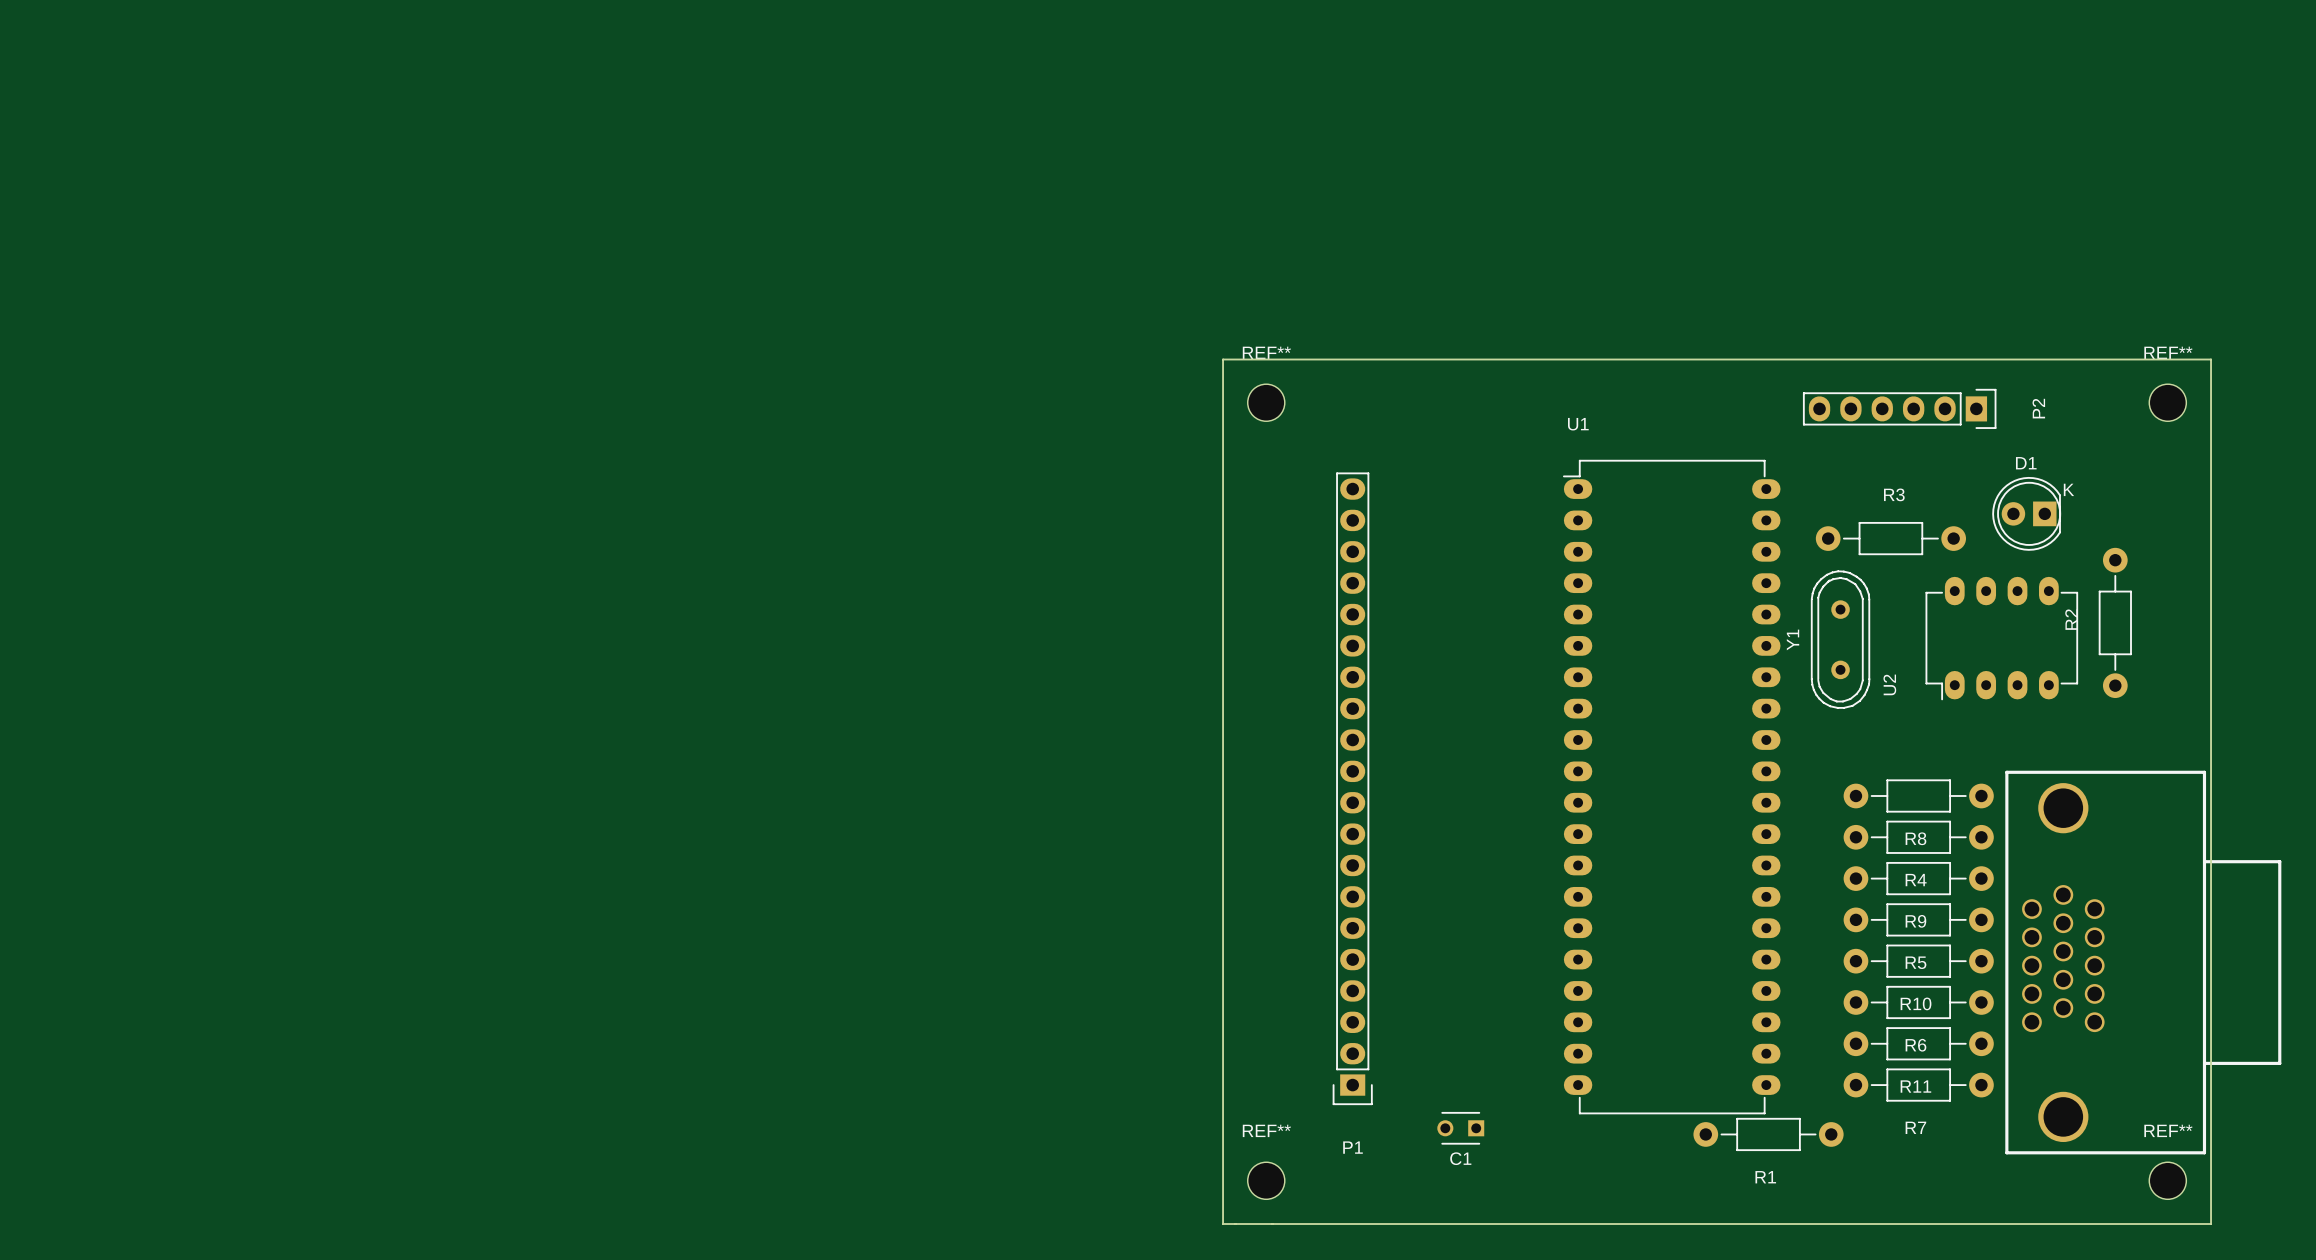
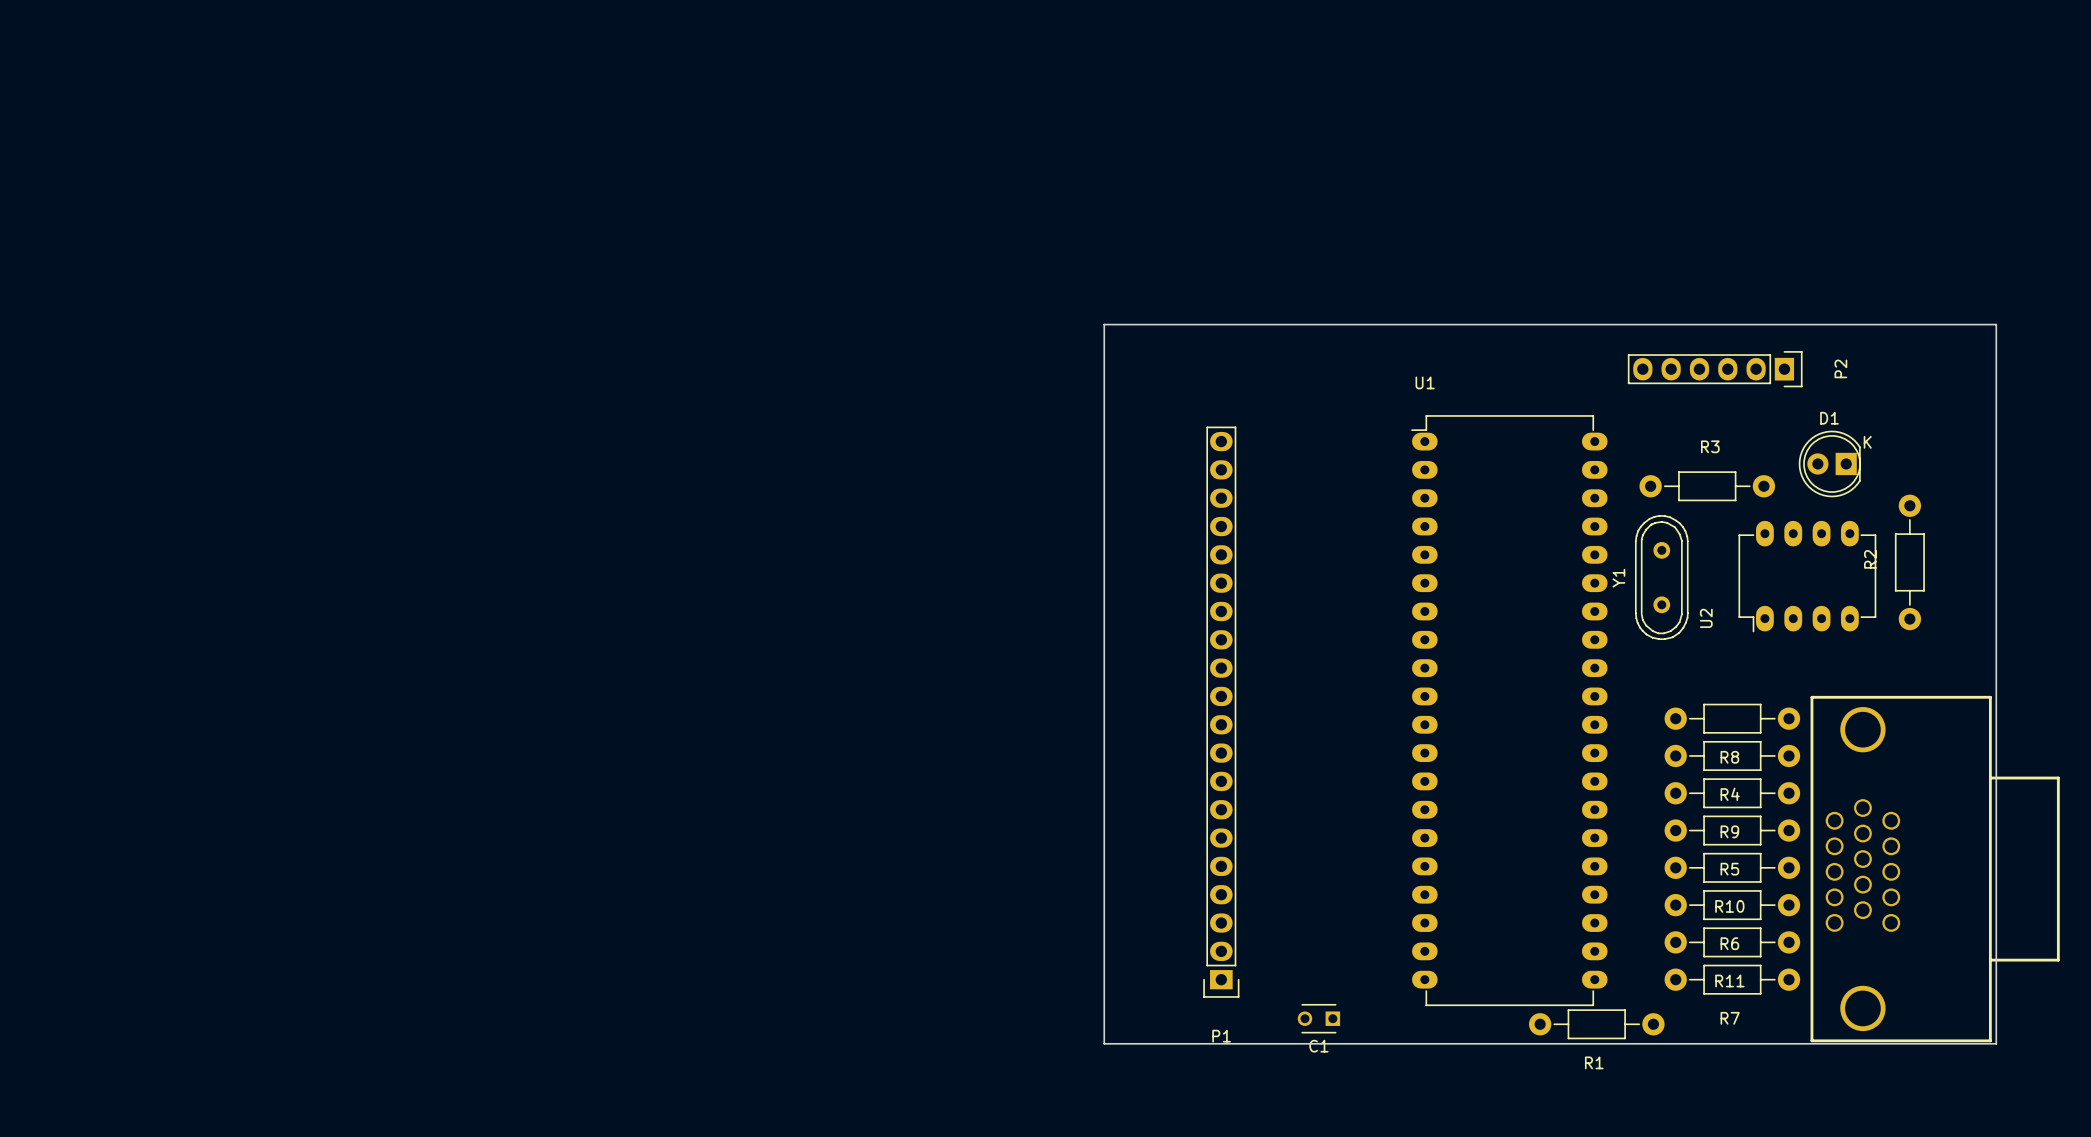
REF**: (1266, 402) -> none
REF**: (2167, 402) -> none
board edge: (1223, 1156) (1223, 1224) (2211, 1224) (2211, 1156) -> (1104, 1043) (1996, 1043)
REF**: (1266, 1180) -> none
REF**: (2167, 1180) -> none

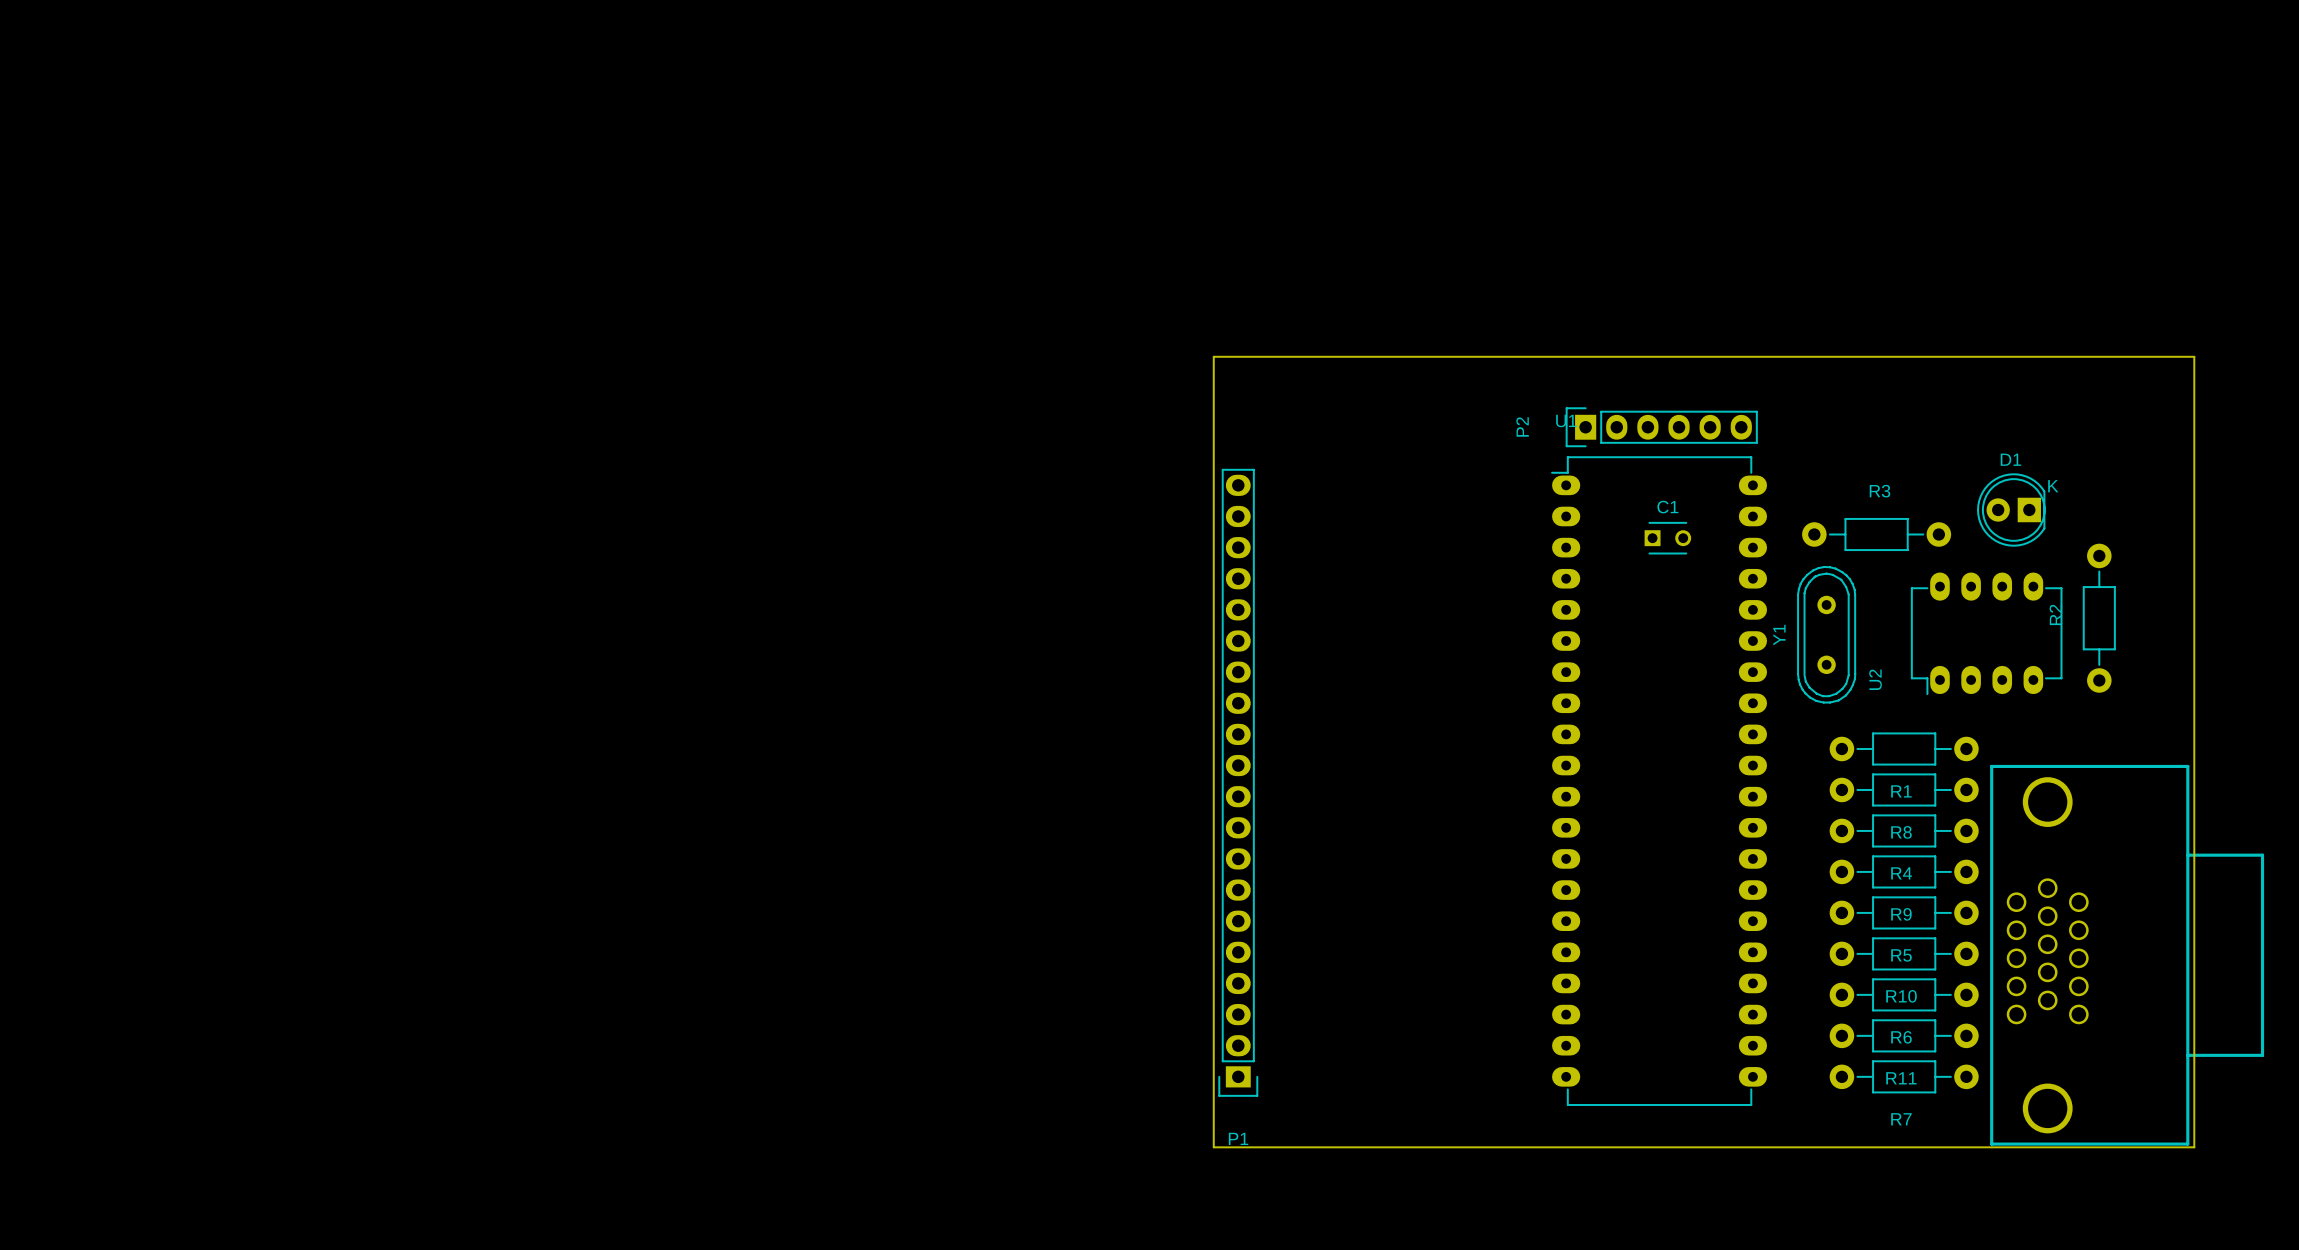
P2 rotation: 0° (1715, 369) -> 180° (1661, 427)
P2 position: (1715, 369) -> (1661, 427)
P1 position: (1221, 712) -> (1238, 782)
C1 rotation: 0° (1318, 1018) -> 180° (1667, 538)
C1 position: (1318, 1018) -> (1667, 538)
R1 position: (1596, 1024) -> (1904, 748)

